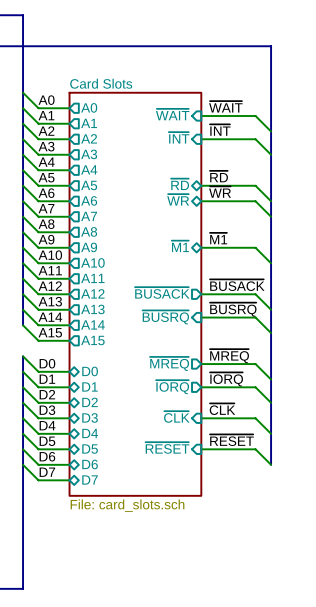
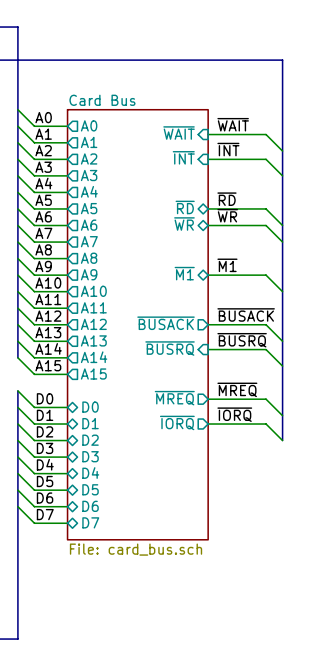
sheet Card Slots name: Card Slots (101, 83) -> Card Bus (102, 100)
bus: (271, 402) (271, 464) -> none
label: ~{CLK} (222, 409) -> none
sheet pin: ~{CLK} (176, 416) -> none
wire: (201, 418) (255, 418) (271, 433) -> none
label: ~{RESET} (231, 440) -> none
sheet pin: ~{RESET} (167, 447) -> none
wire: (201, 449) (255, 449) (271, 464) -> none
sheet Card Slots value: File: card_slots.sch (127, 505) -> File: card_bus.sch (136, 549)

